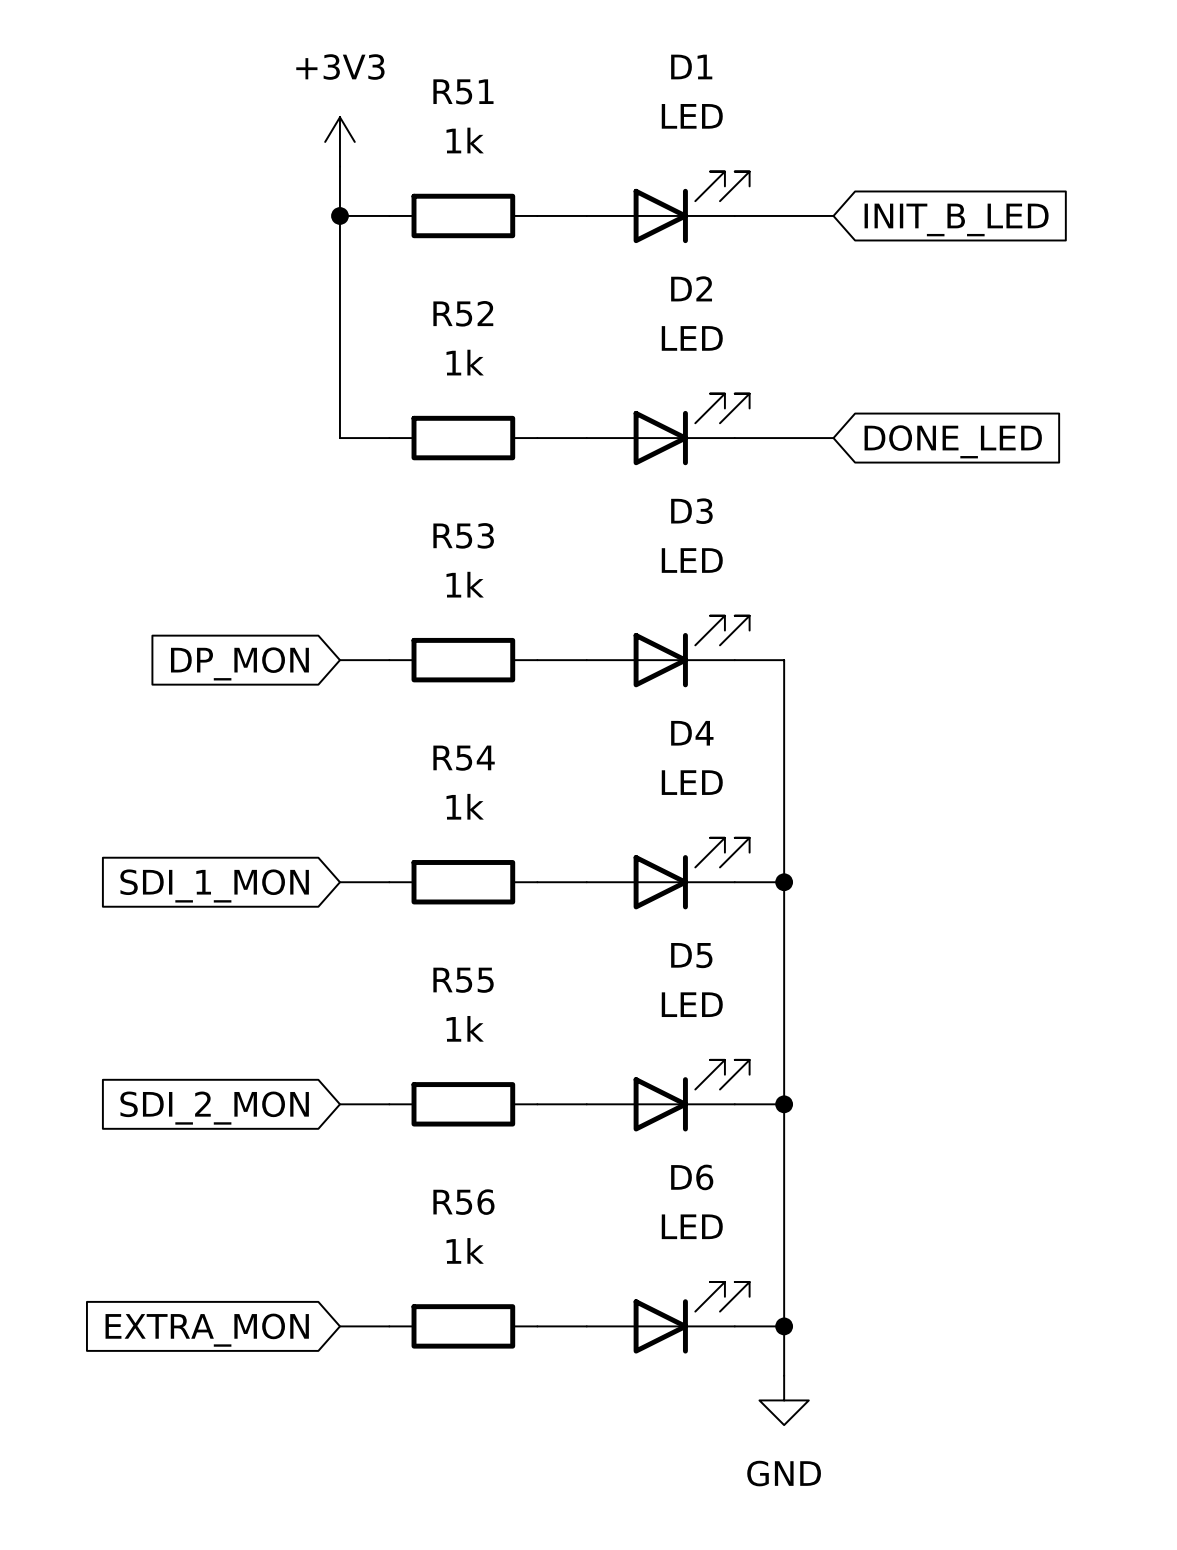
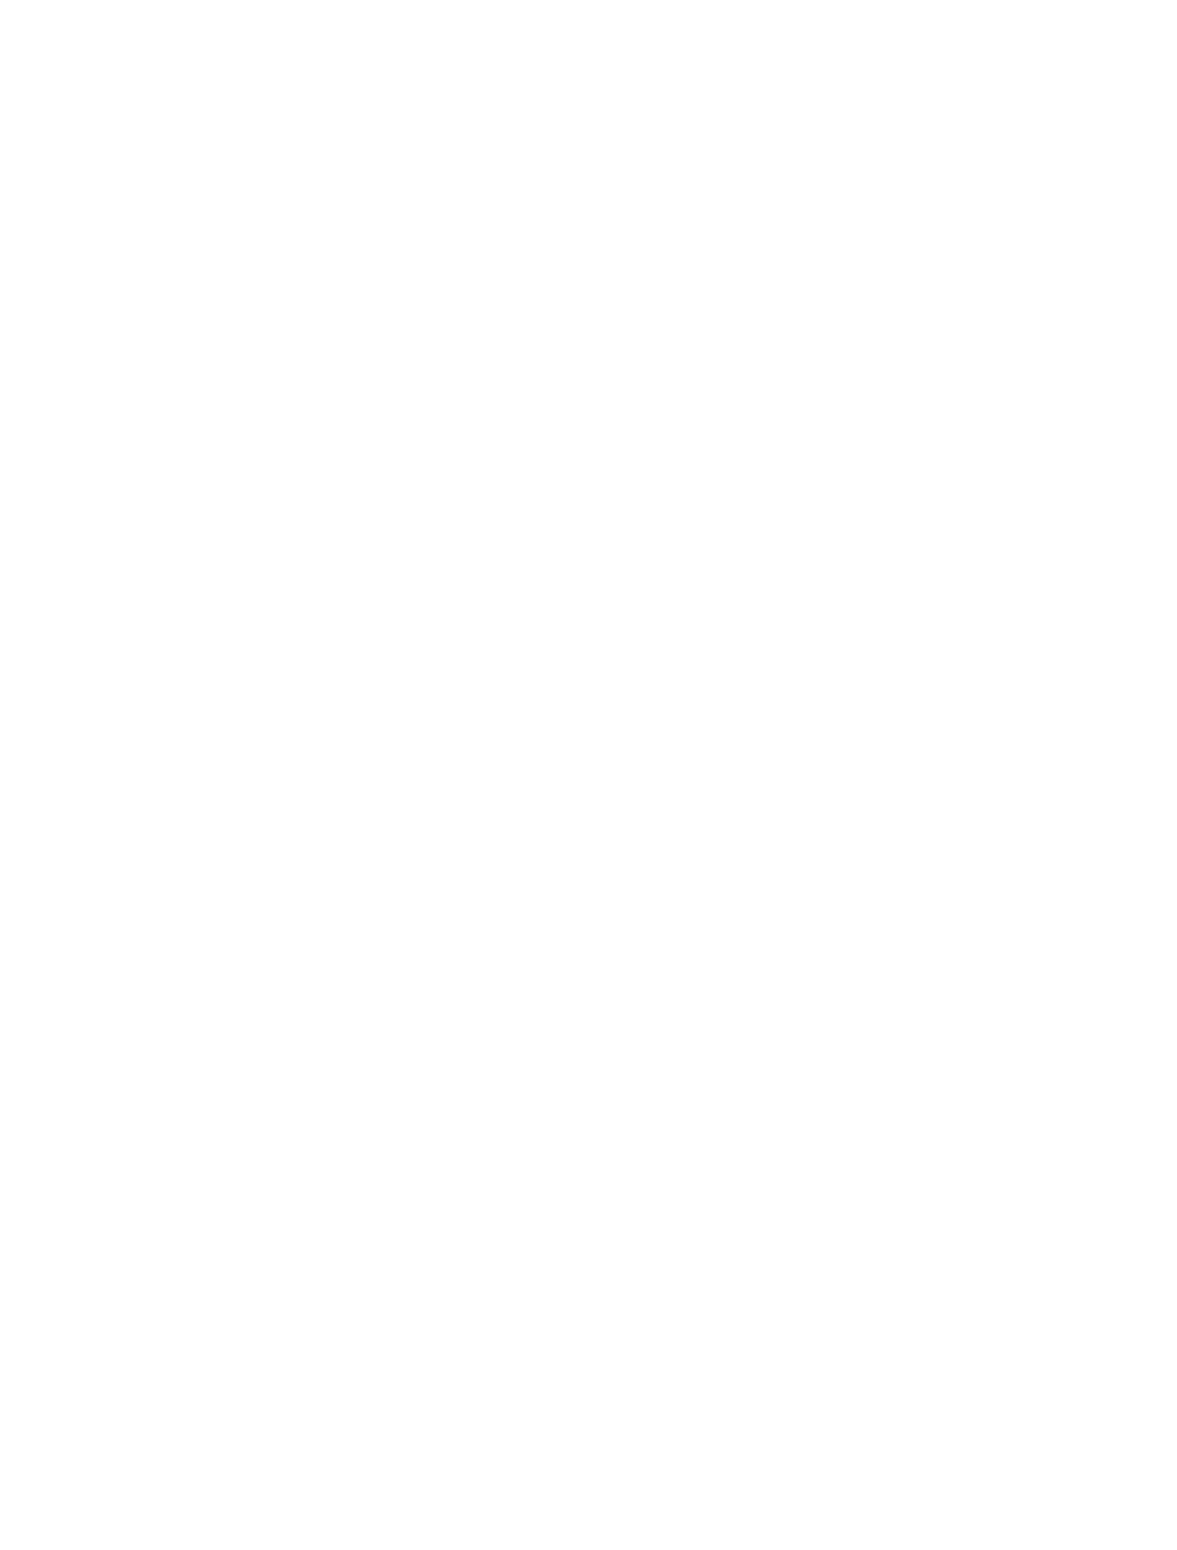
power symbol: +3V3 (339, 141) -> none
wire: (339, 166) (339, 438) (389, 438) -> none
D1: LED (668, 207) -> none
wire: (339, 215) (389, 215) -> none
junction: (339, 215) -> none
R51: 1k (463, 215) -> none
wire: (537, 215) (586, 215) -> none
wire: (734, 215) (833, 215) -> none
global label: INIT_B_LED (956, 219) -> none
D2: LED (668, 429) -> none
R52: 1k (463, 438) -> none
wire: (537, 438) (586, 438) -> none
wire: (734, 438) (833, 438) -> none
global label: DONE_LED (953, 441) -> none
D3: LED (668, 651) -> none
wire: (339, 660) (389, 660) -> none
R53: 1k (463, 660) -> none
wire: (537, 660) (586, 660) -> none
wire: (734, 660) (784, 660) (784, 1375) -> none
global label: DP_MON (239, 663) -> none
D4: LED (668, 873) -> none
wire: (339, 882) (389, 882) -> none
R54: 1k (463, 882) -> none
wire: (537, 882) (586, 882) -> none
wire: (734, 882) (784, 882) -> none
junction: (784, 882) -> none
global label: SDI_1_MON (214, 886) -> none
D5: LED (668, 1095) -> none
wire: (339, 1104) (389, 1104) -> none
R55: 1k (463, 1104) -> none
wire: (537, 1104) (586, 1104) -> none
wire: (734, 1104) (784, 1104) -> none
junction: (784, 1104) -> none
global label: SDI_2_MON (214, 1108) -> none
D6: LED (668, 1317) -> none
wire: (339, 1326) (389, 1326) -> none
R56: 1k (463, 1326) -> none
wire: (537, 1326) (586, 1326) -> none
wire: (734, 1326) (784, 1326) -> none
junction: (784, 1326) -> none
global label: EXTRA_MON (207, 1330) -> none
power symbol: GND (784, 1400) -> none

